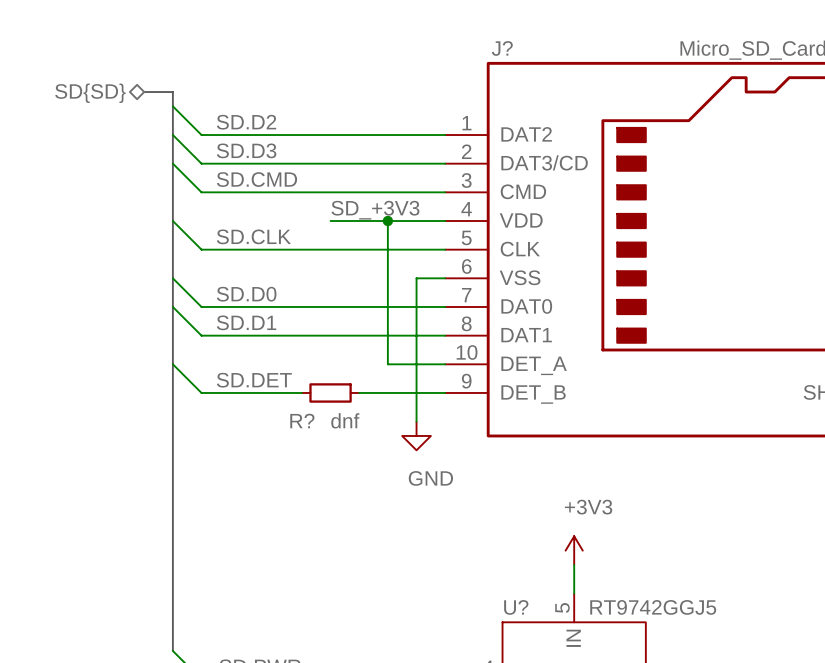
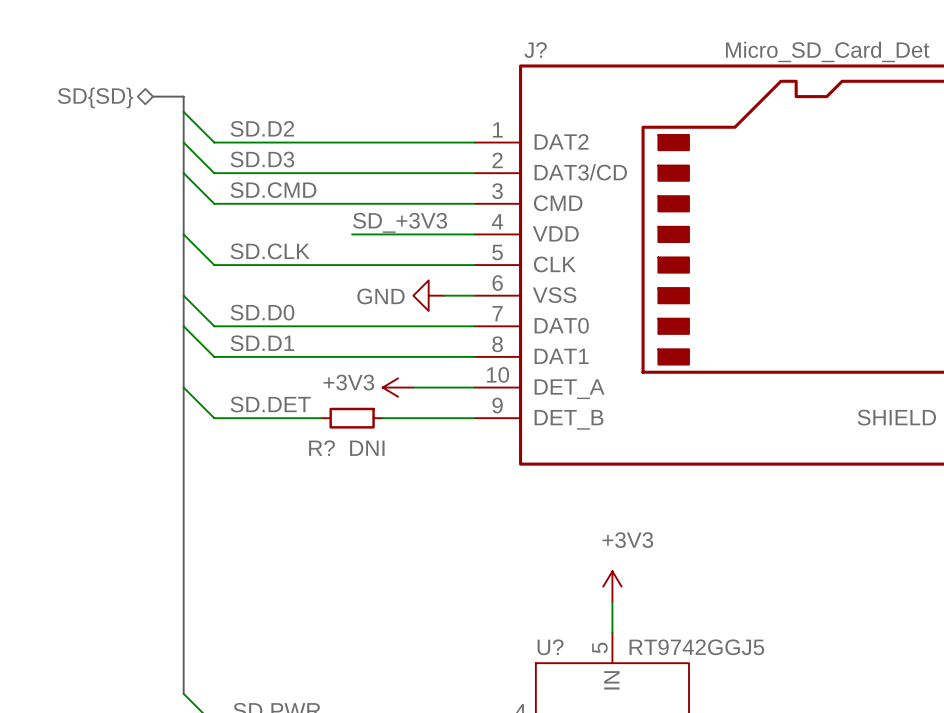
wire: (387, 221) (387, 364) -> none
junction: (387, 221) -> none
wire: (416, 278) (416, 421) -> none
power symbol: none -> +3V3 (398, 387)
R? value: dnf (345, 420) -> DNI (367, 448)
power symbol rotation: 0° (416, 435) -> 90° clockwise (428, 295)
power symbol position: GND (416, 435) -> GND (428, 295)

